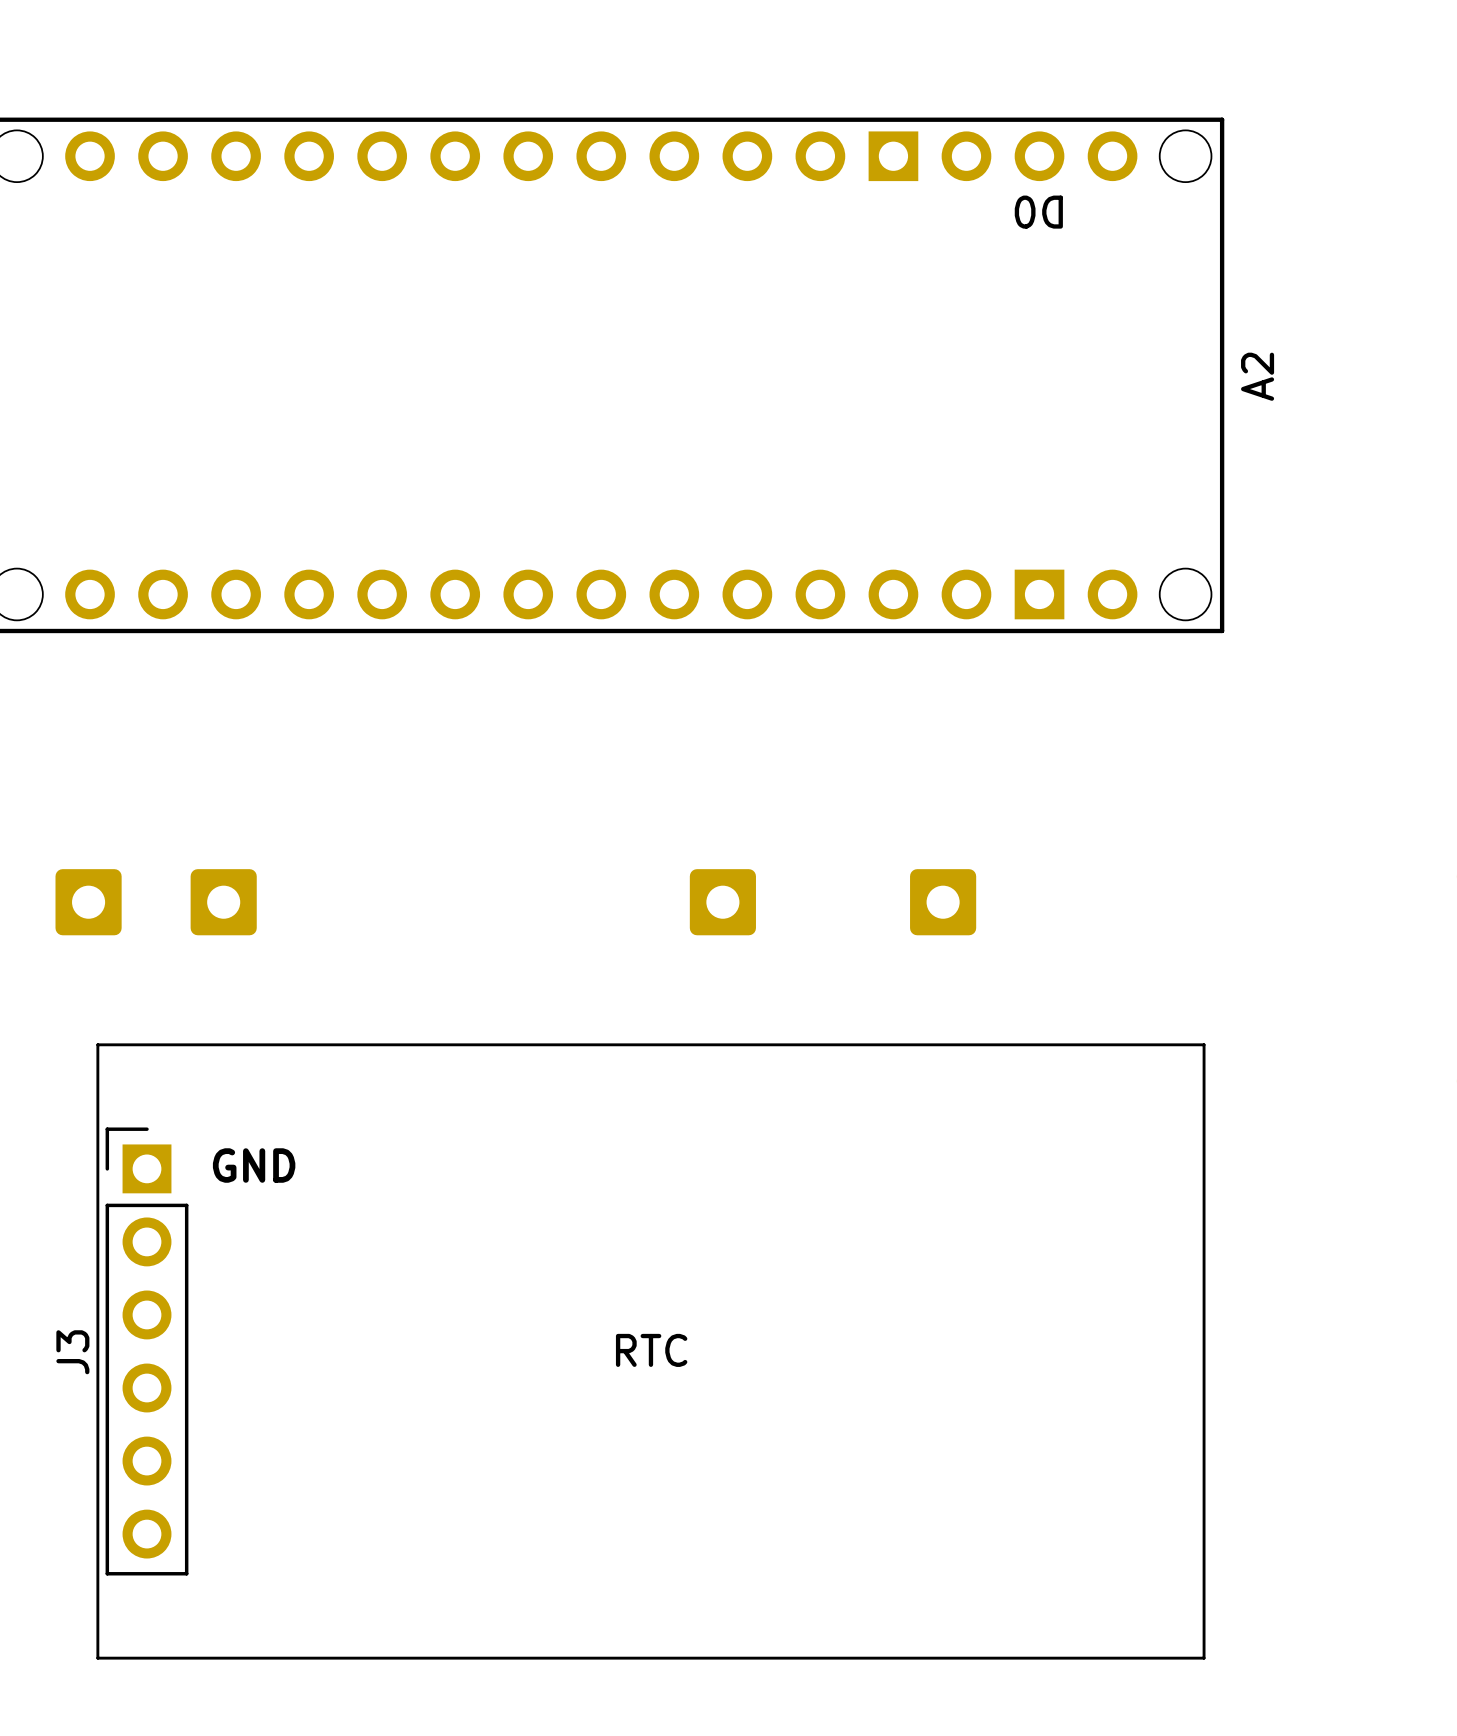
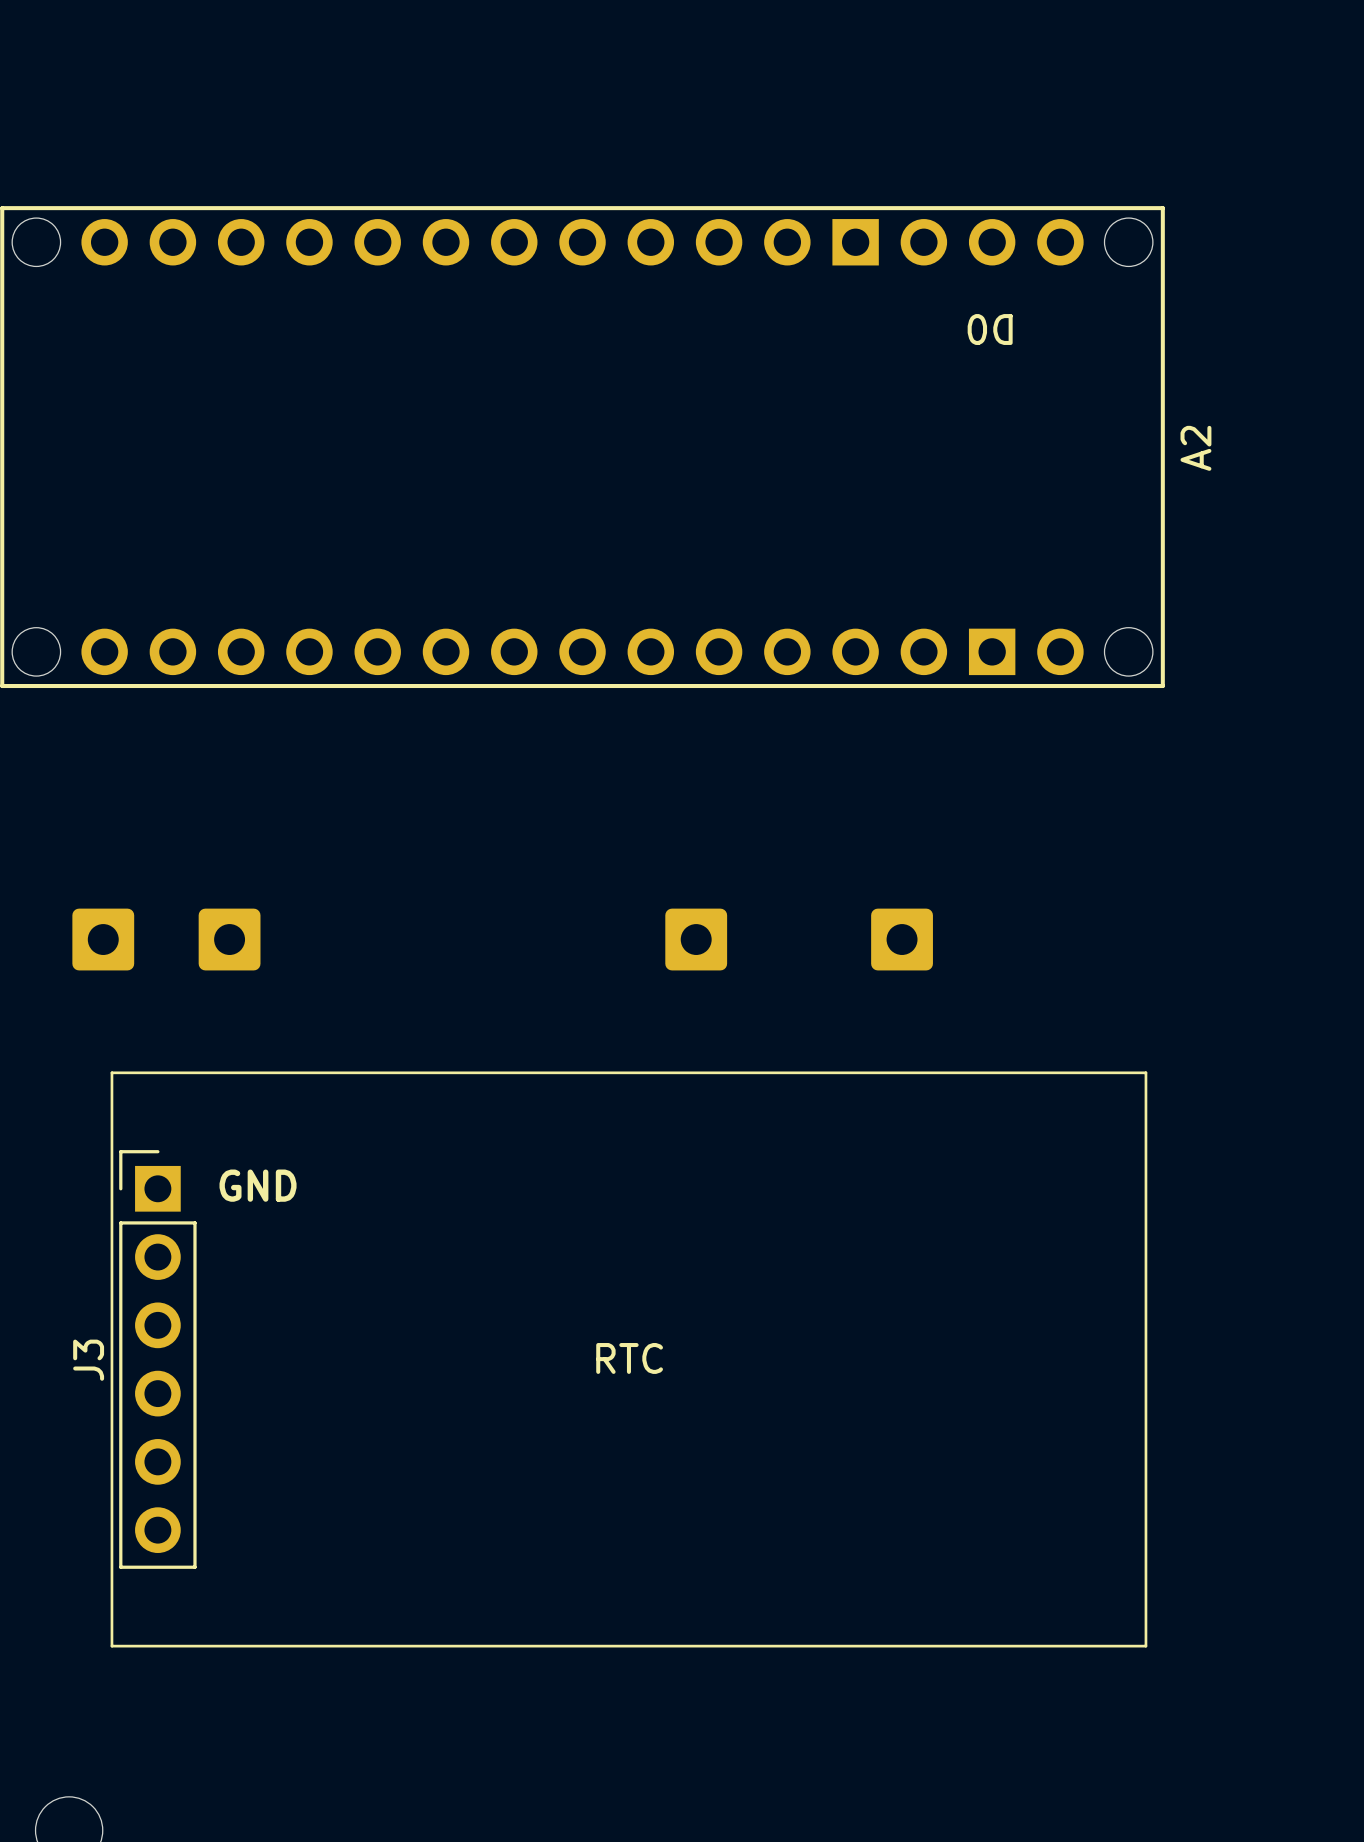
A2 text position: D0 (1038, 212) -> D0 (990, 329)

